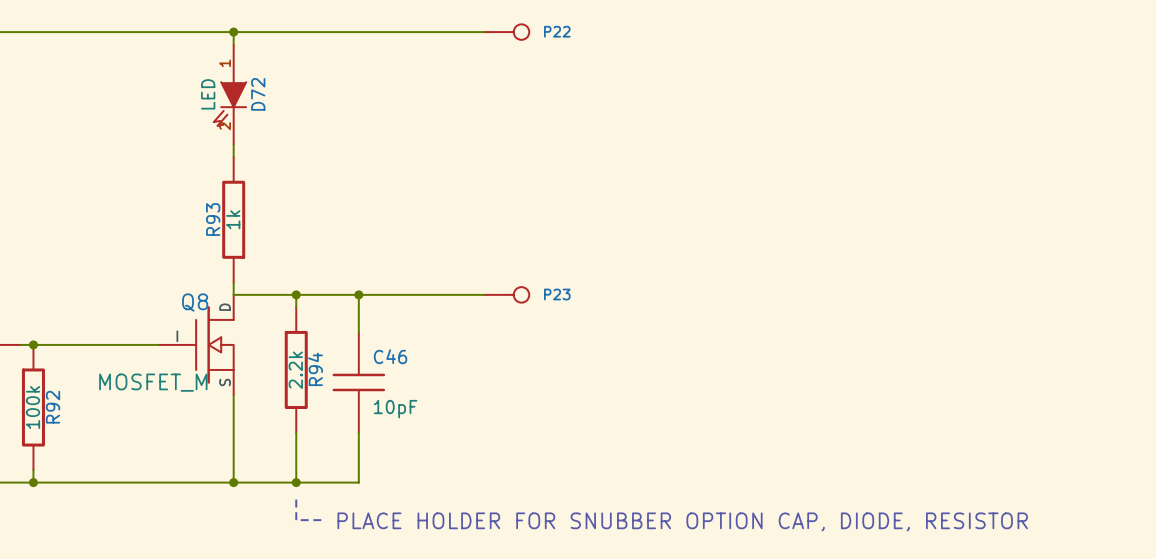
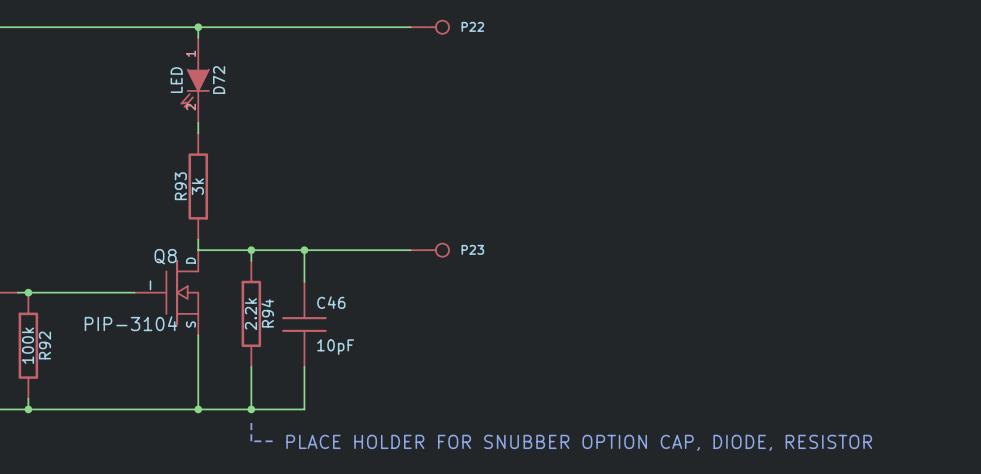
R93 value: 1k (233, 219) -> 3k (197, 186)
Q8 value: MOSFET_M (153, 382) -> PIP-3104 (130, 323)

